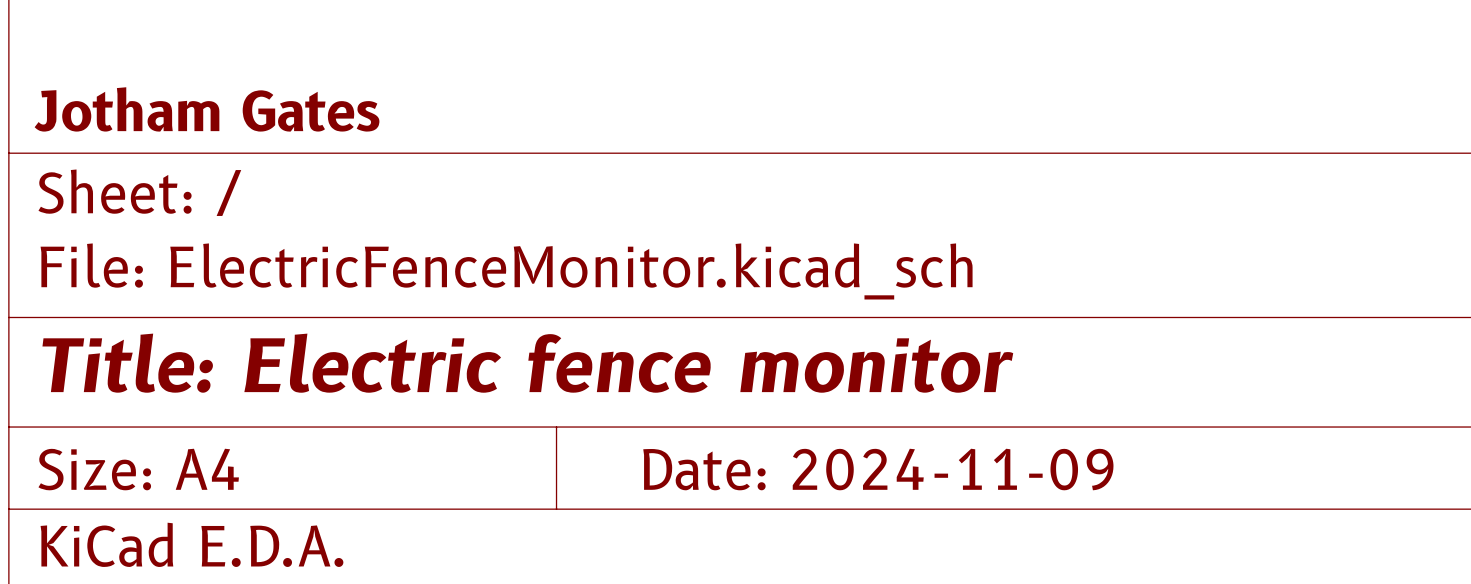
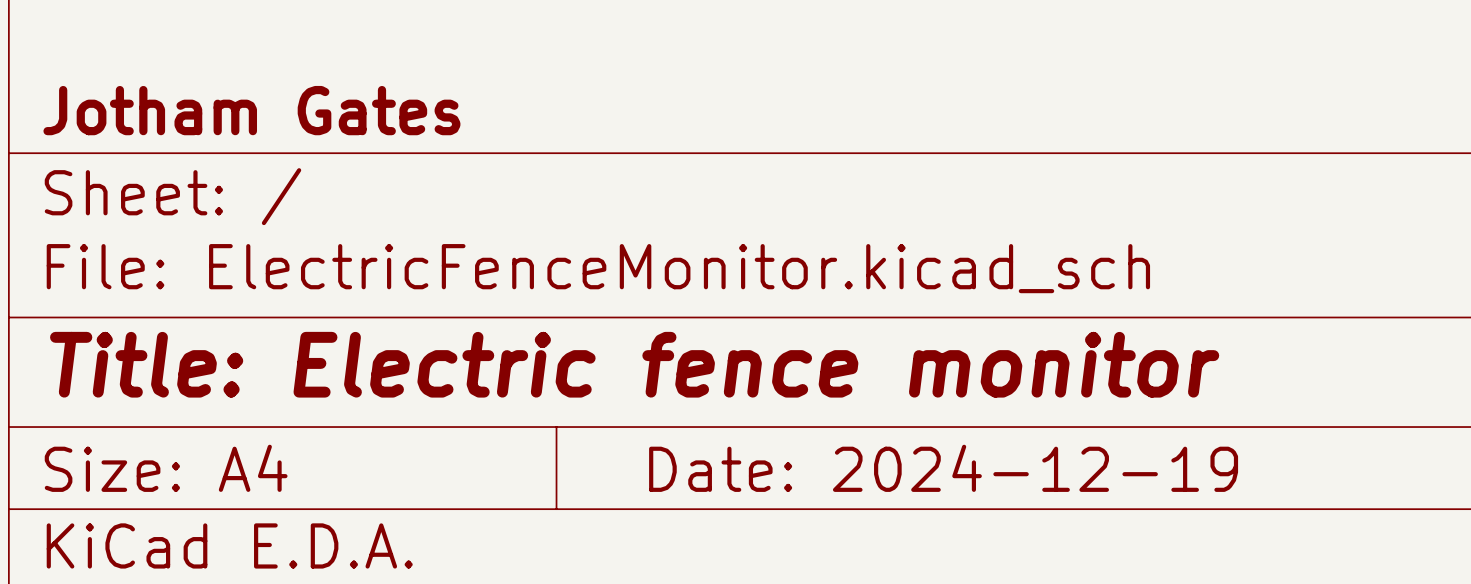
title block: Date: 2024-11-09 (878, 469) -> Date: 2024-12-19 (943, 468)

